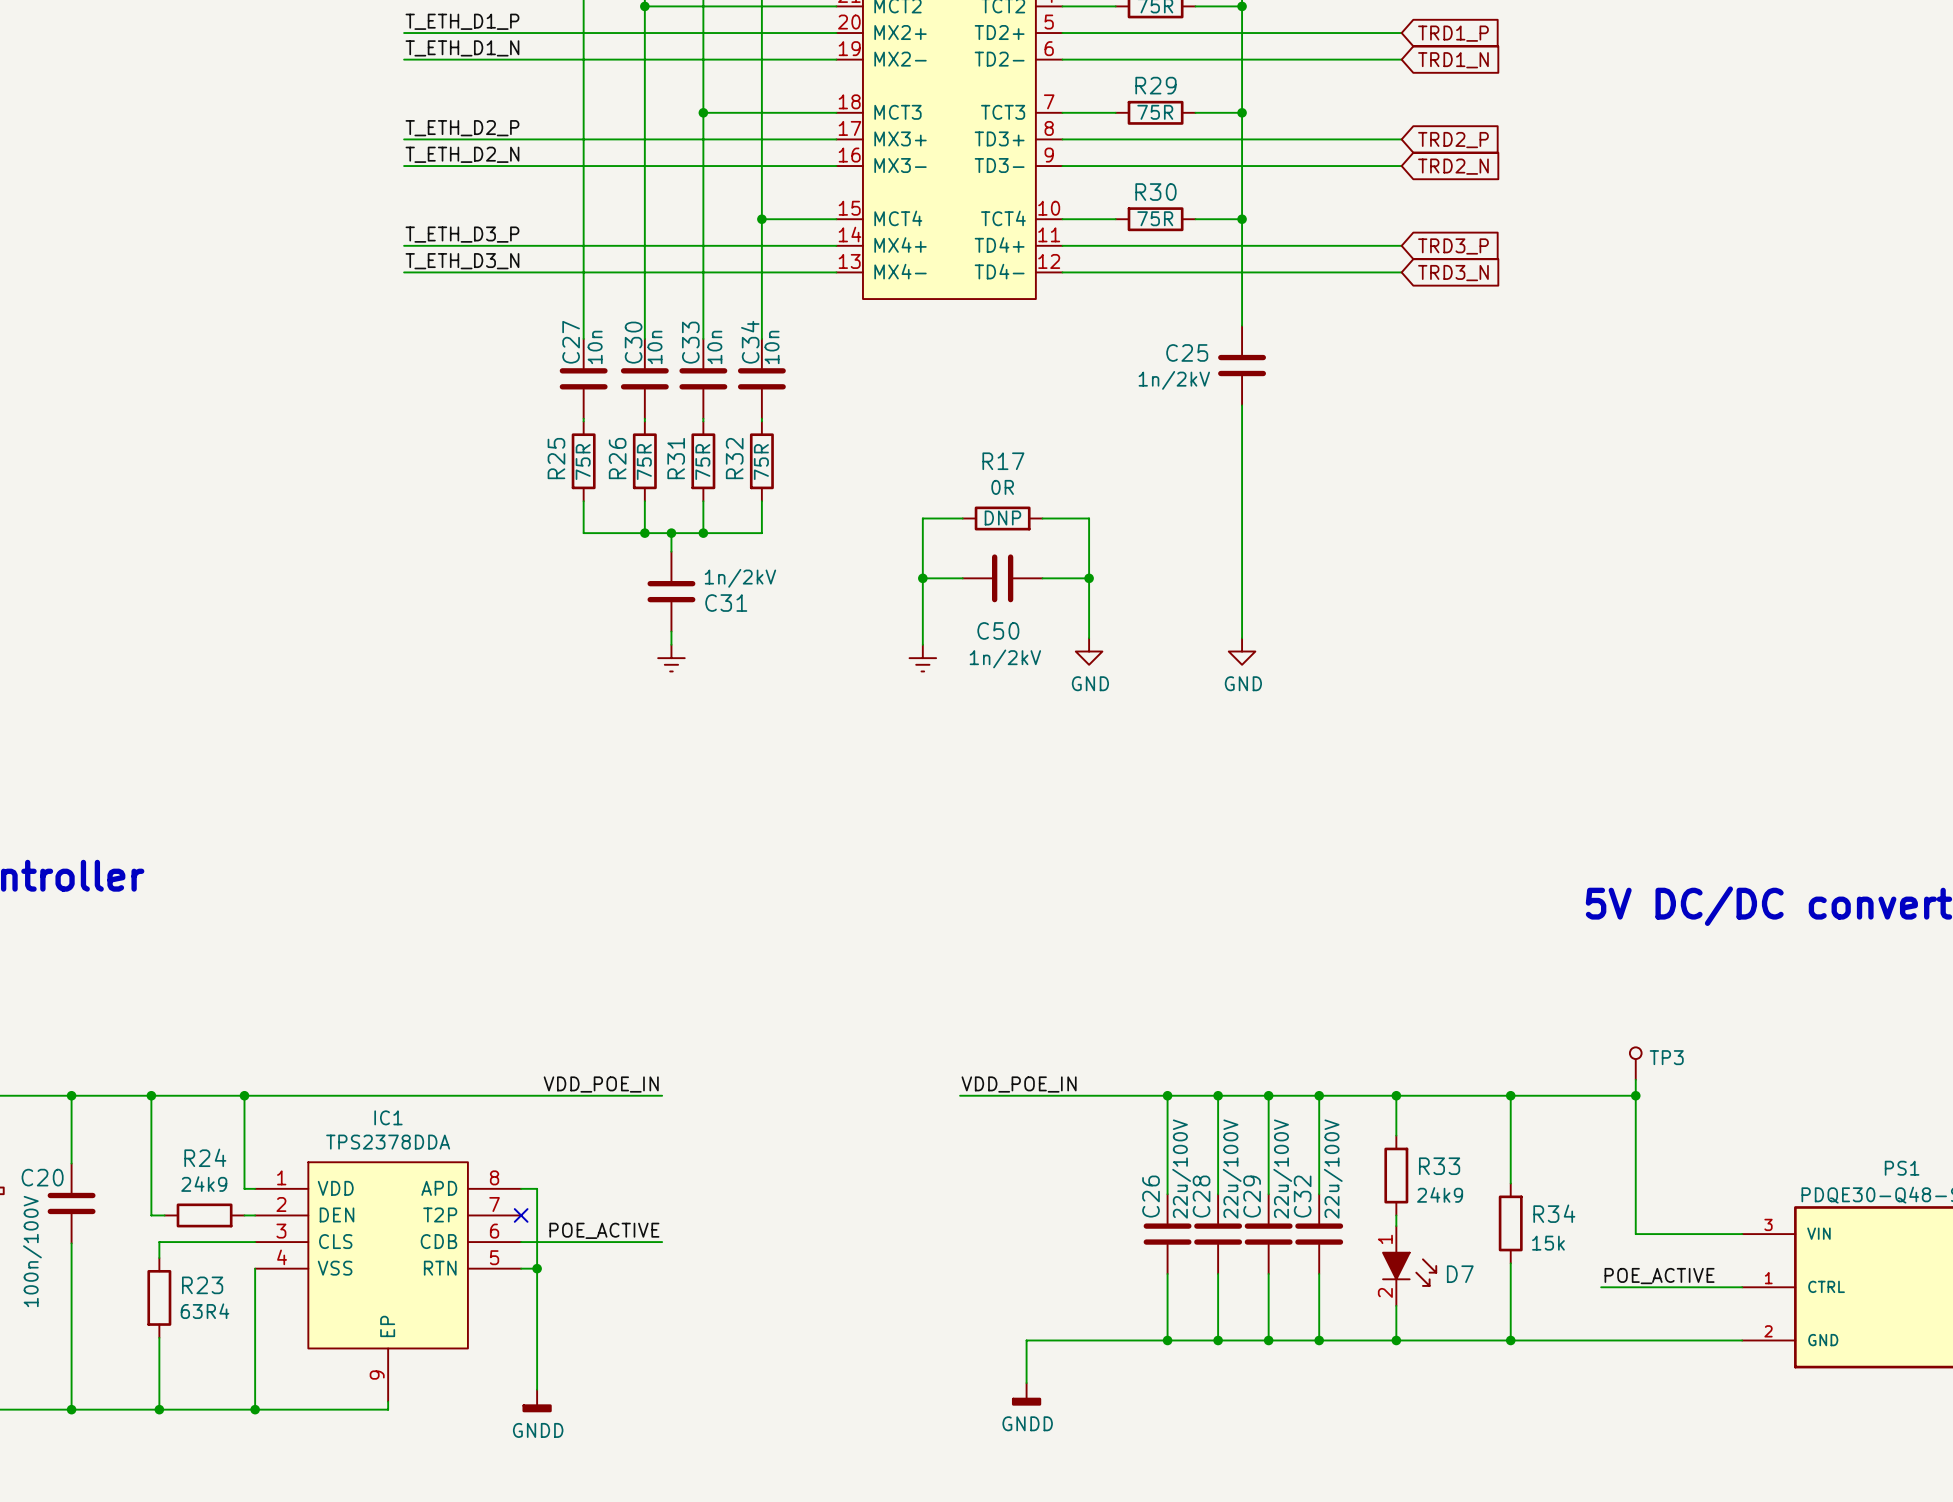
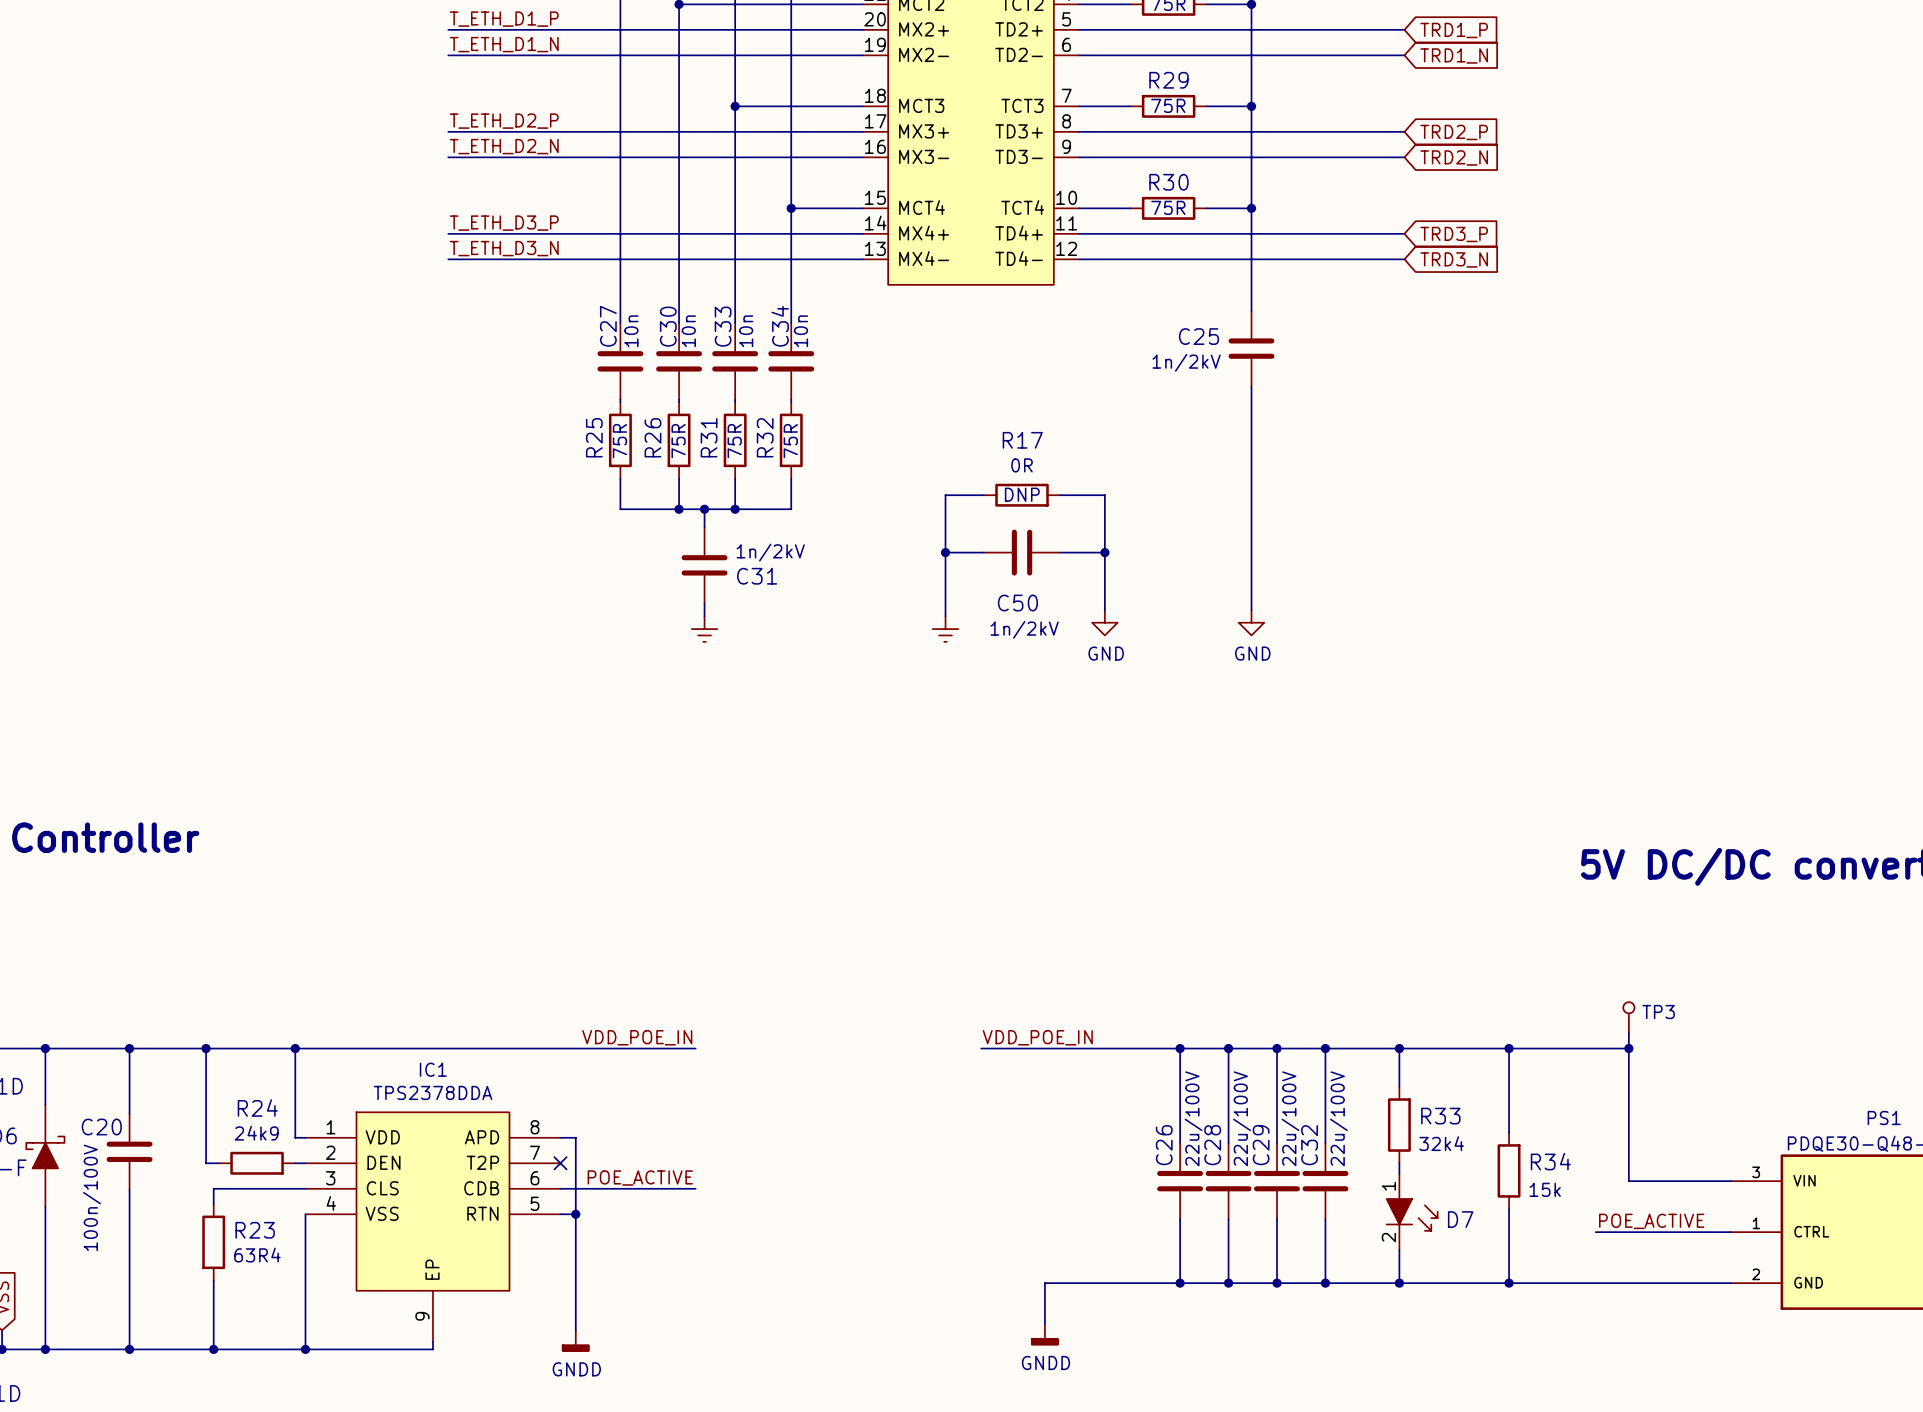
R33 text: 24k9 (1440, 1194) -> 32k4 (1441, 1143)

